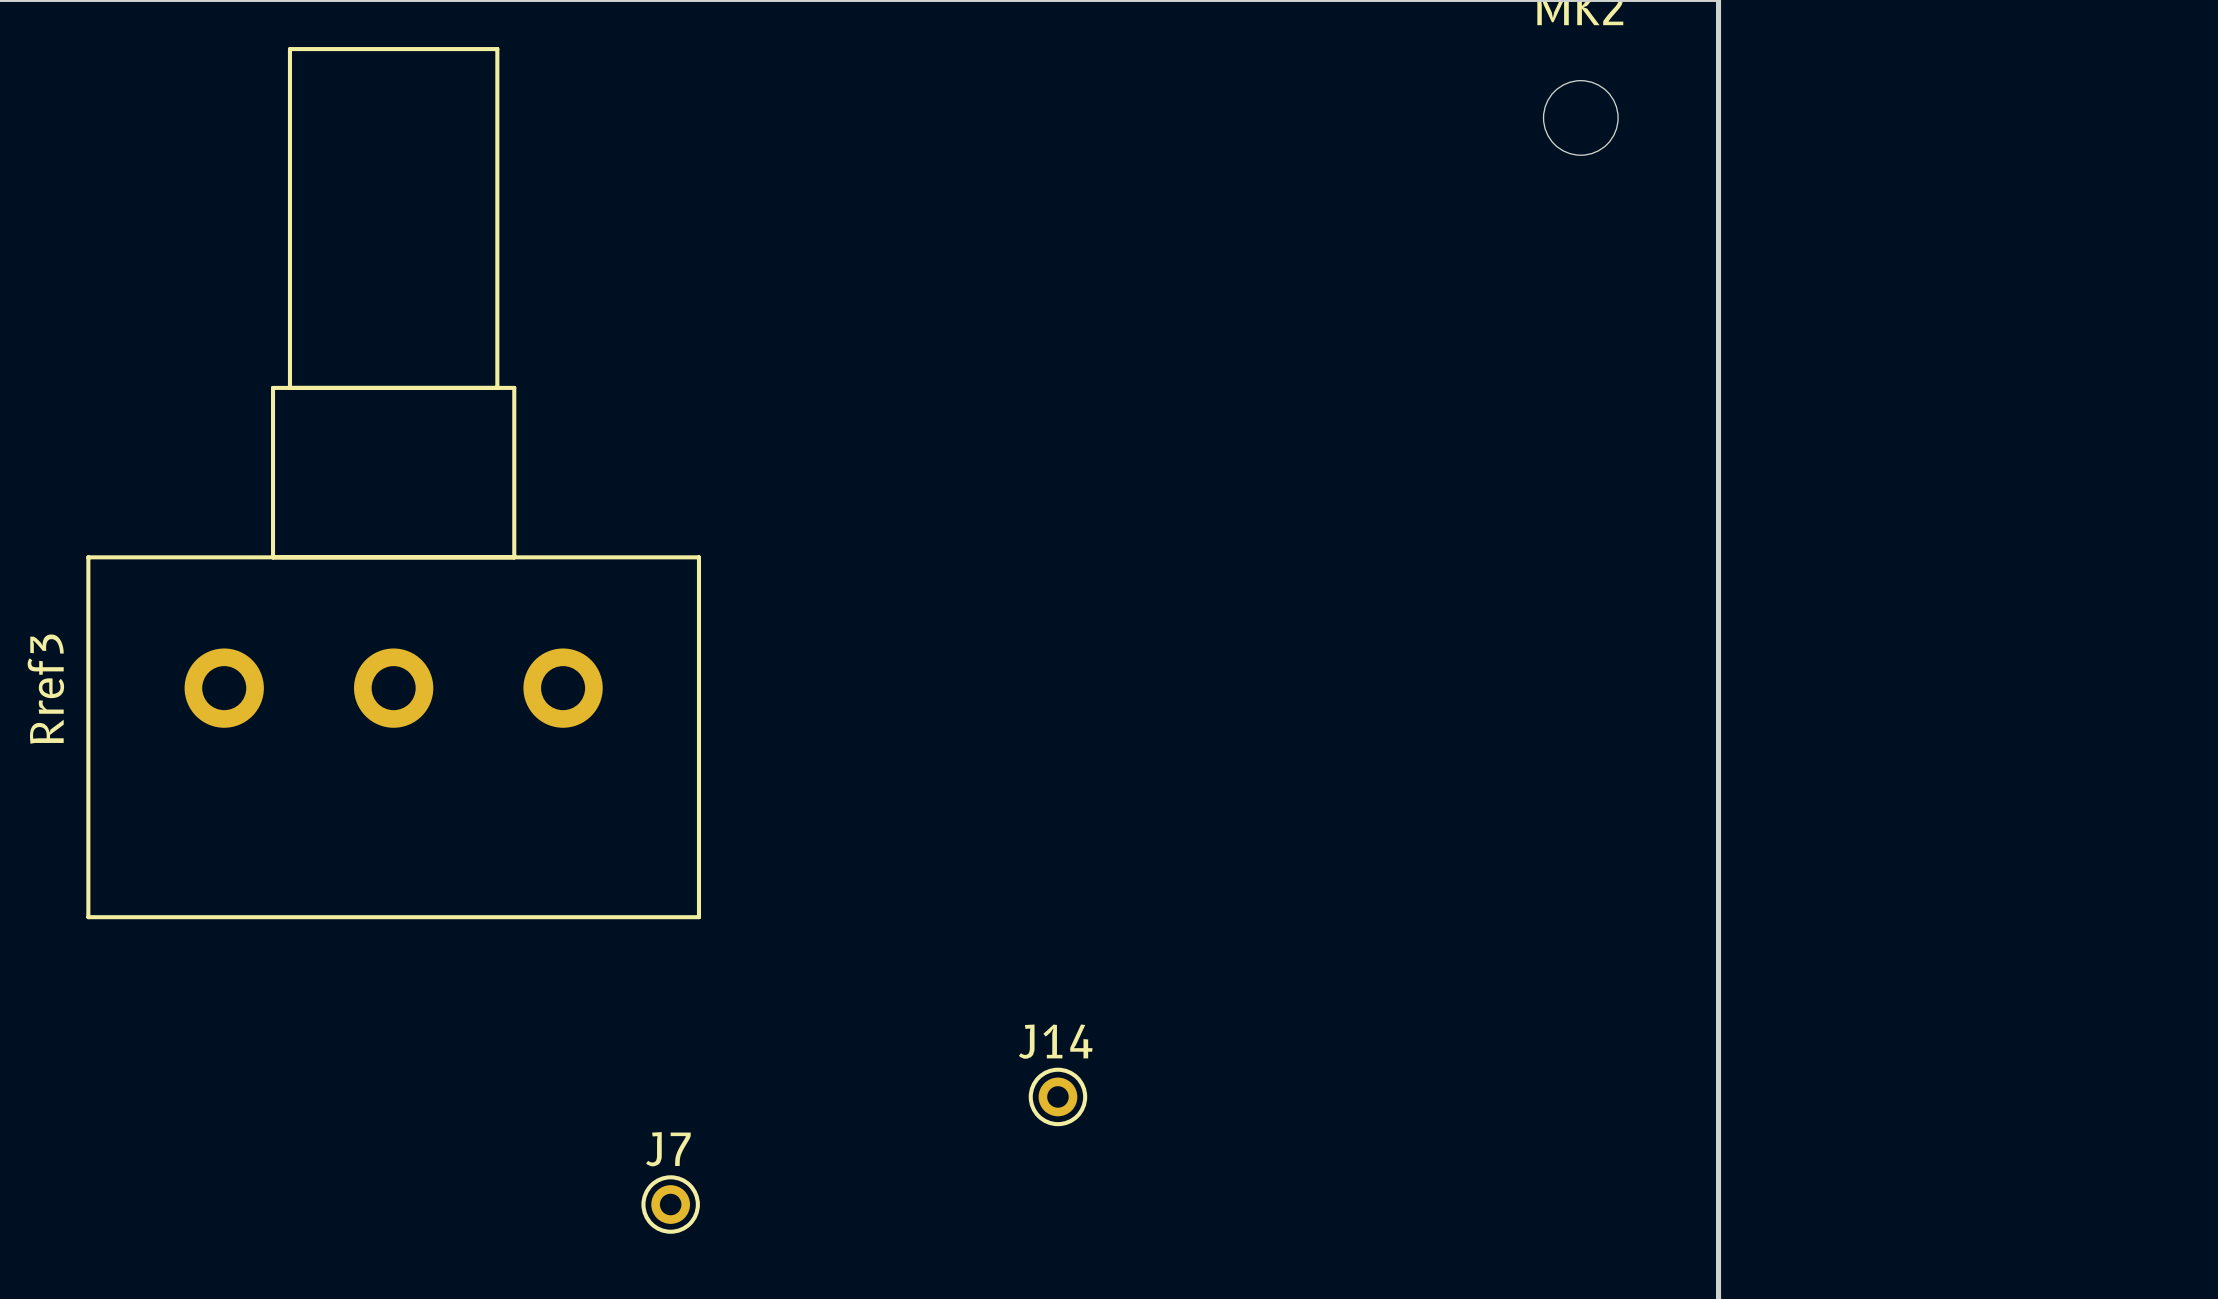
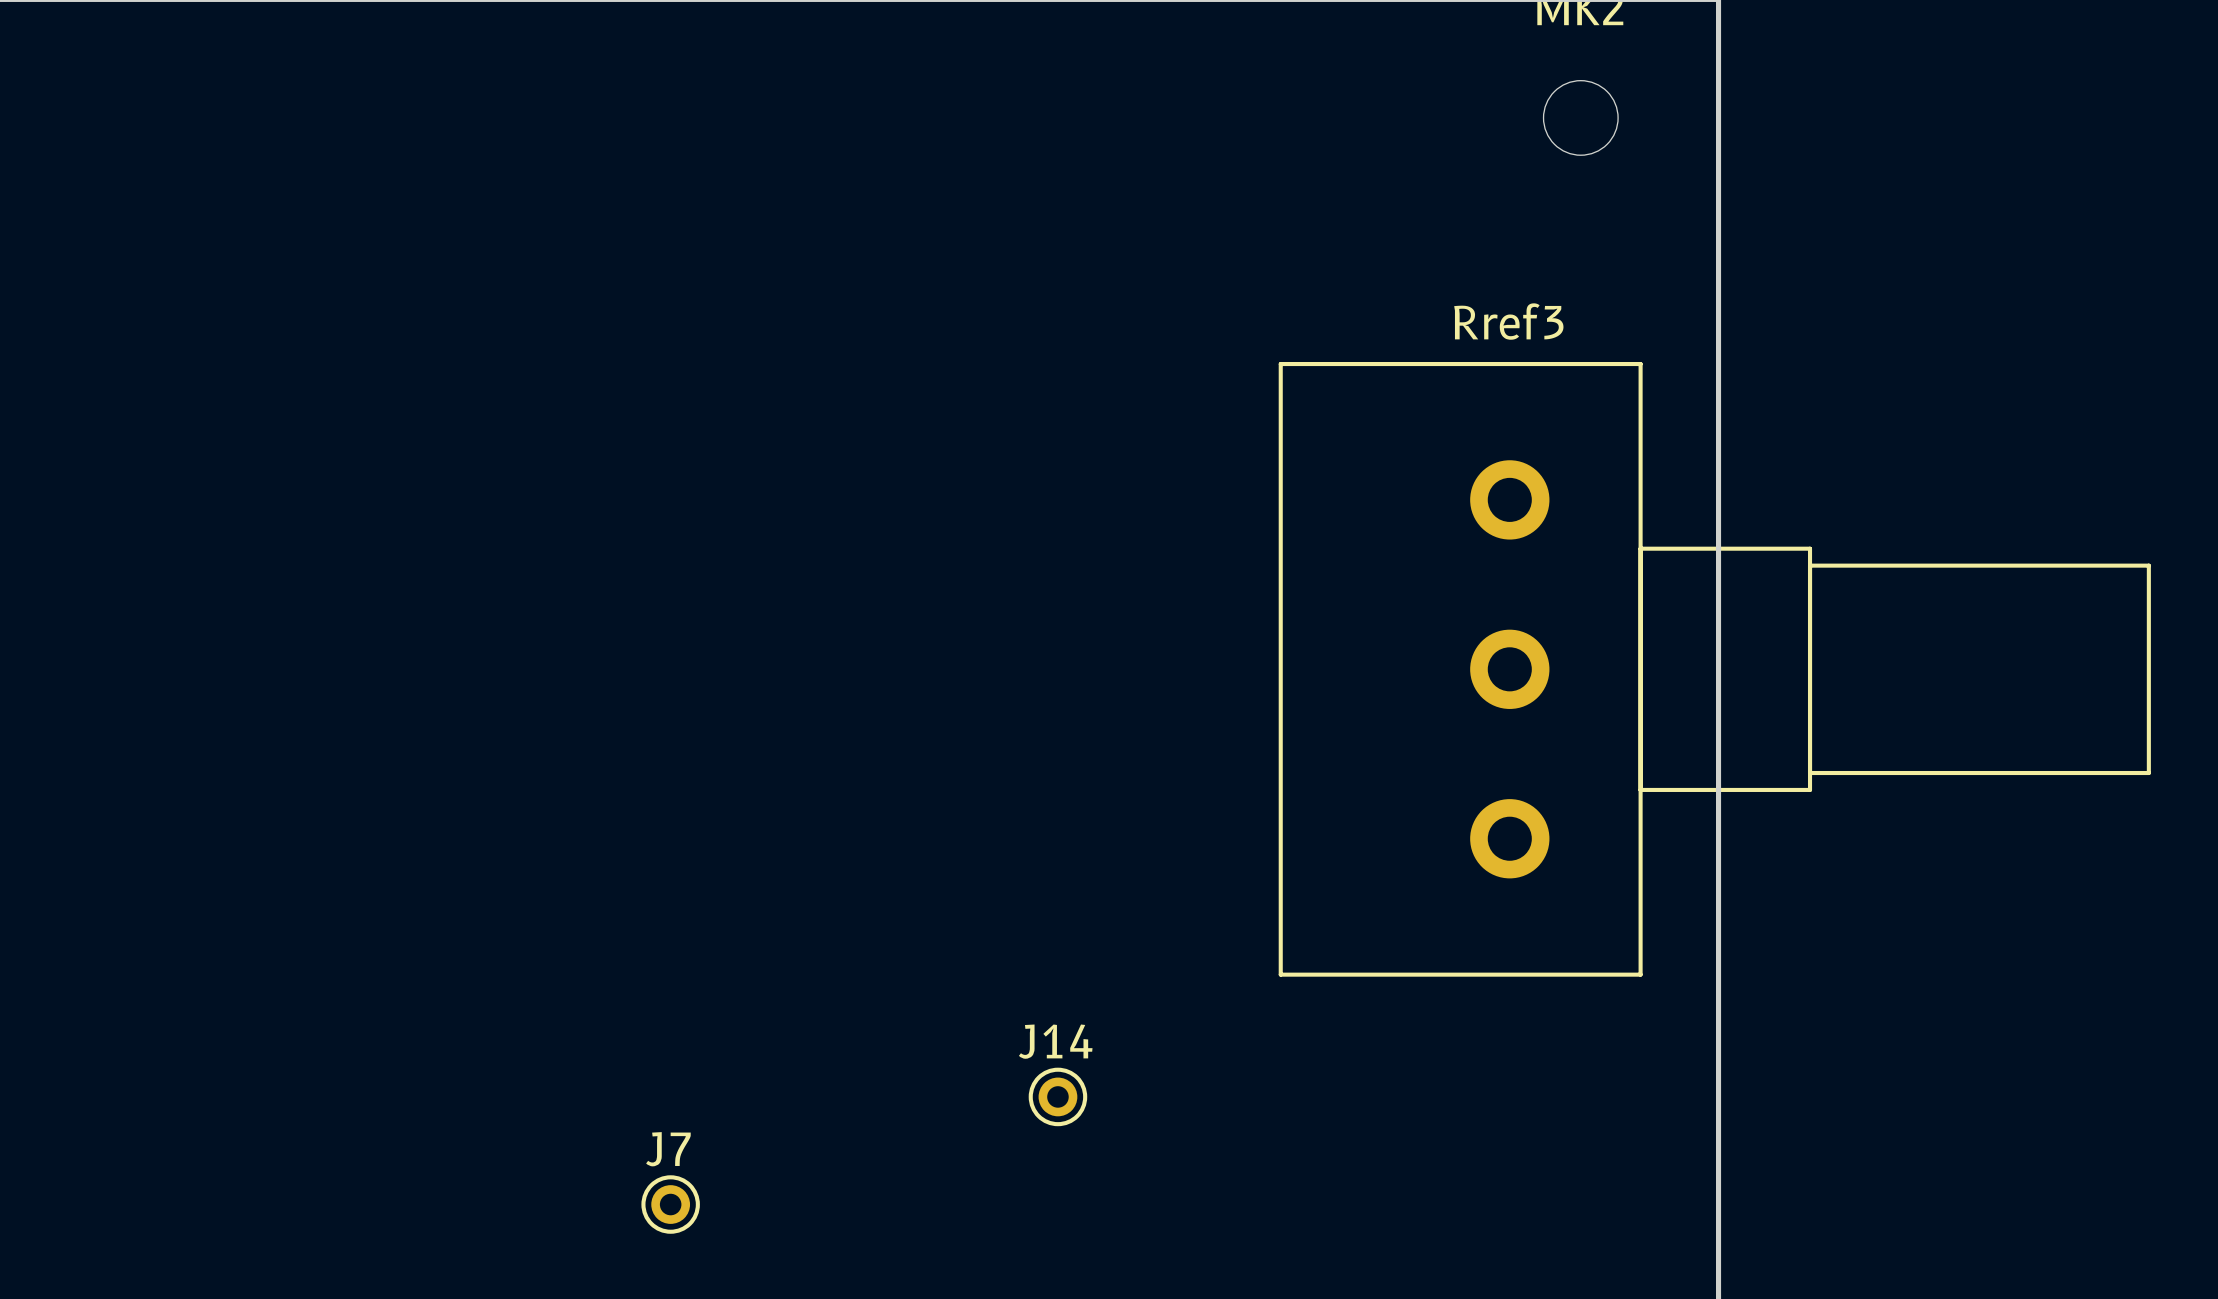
Rref3 rotation: 0° (393, 483) -> 90° clockwise (1714, 669)
Rref3 position: (393, 483) -> (1714, 669)

